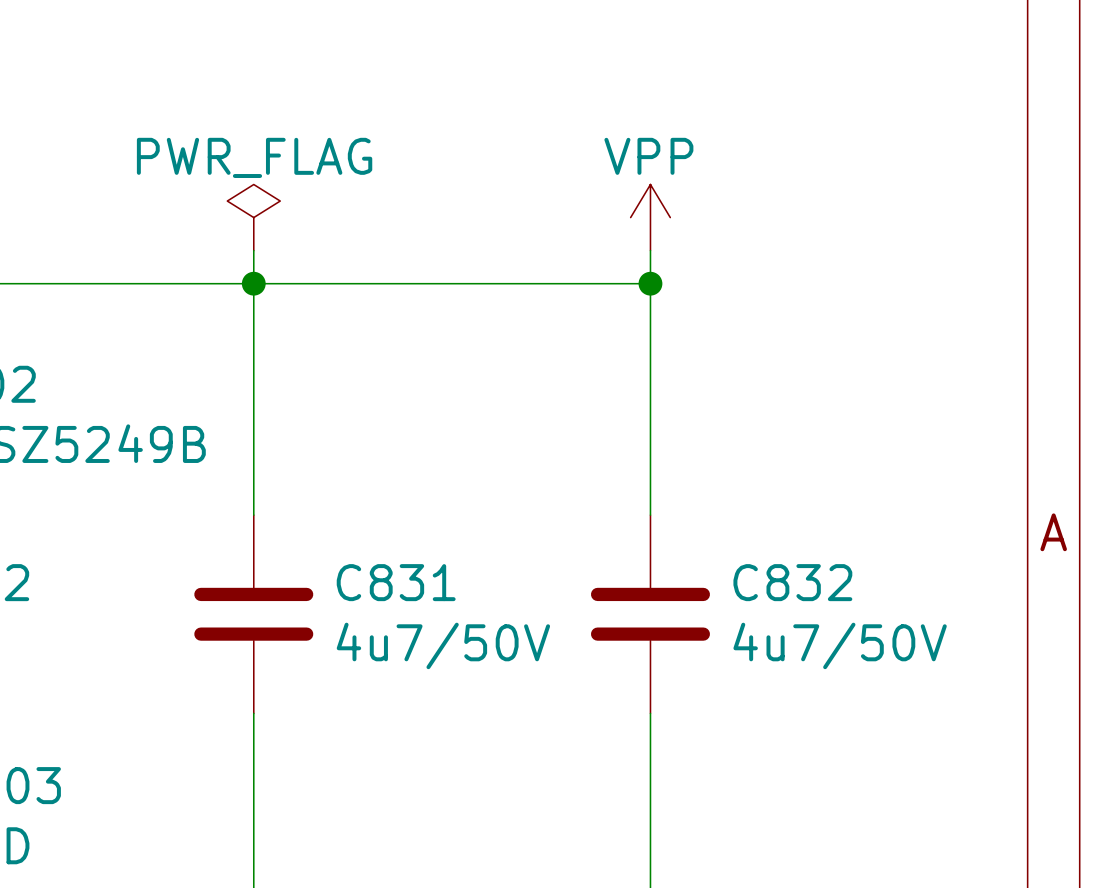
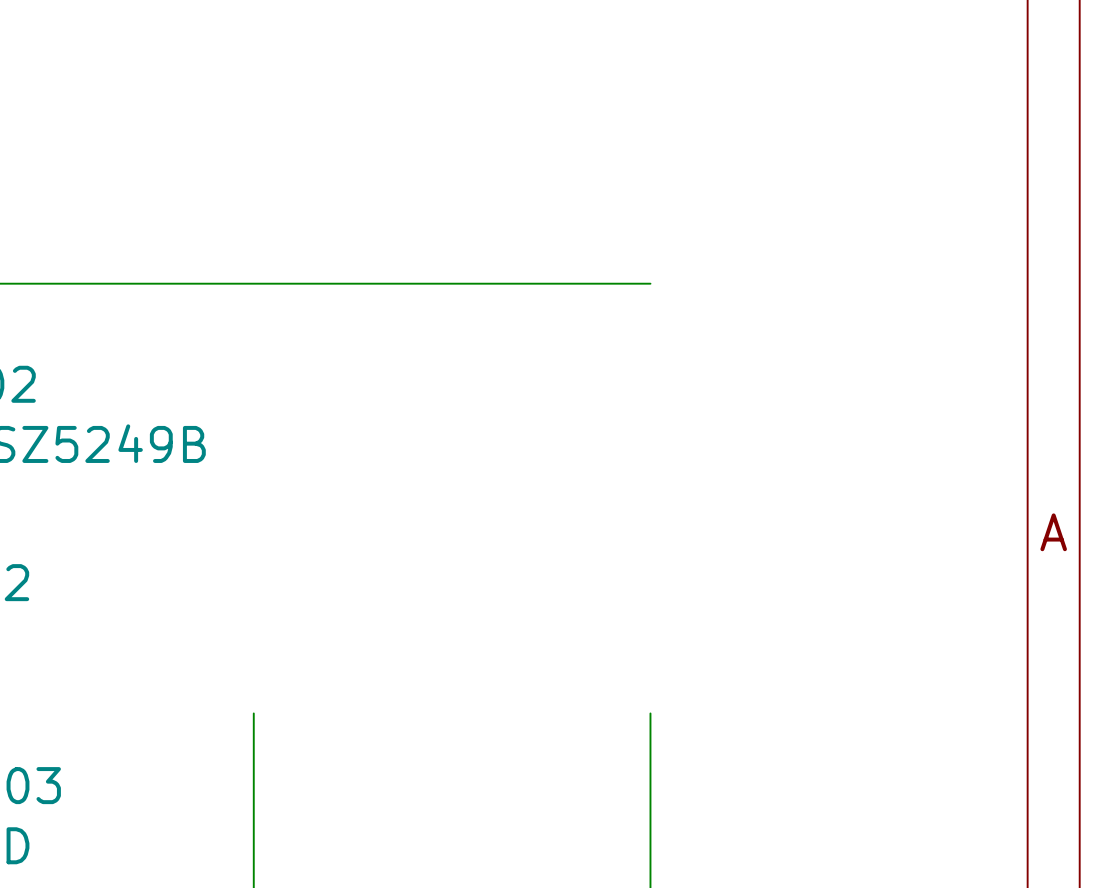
power symbol: PWR_FLAG (253, 217) -> none
power symbol: VPP (650, 217) -> none
wire: (253, 250) (253, 515) -> none
wire: (650, 250) (650, 515) -> none
junction: (253, 283) -> none
junction: (650, 283) -> none
C831: 4u7/50V (253, 614) -> none
C832: 4u7/50V (650, 614) -> none

